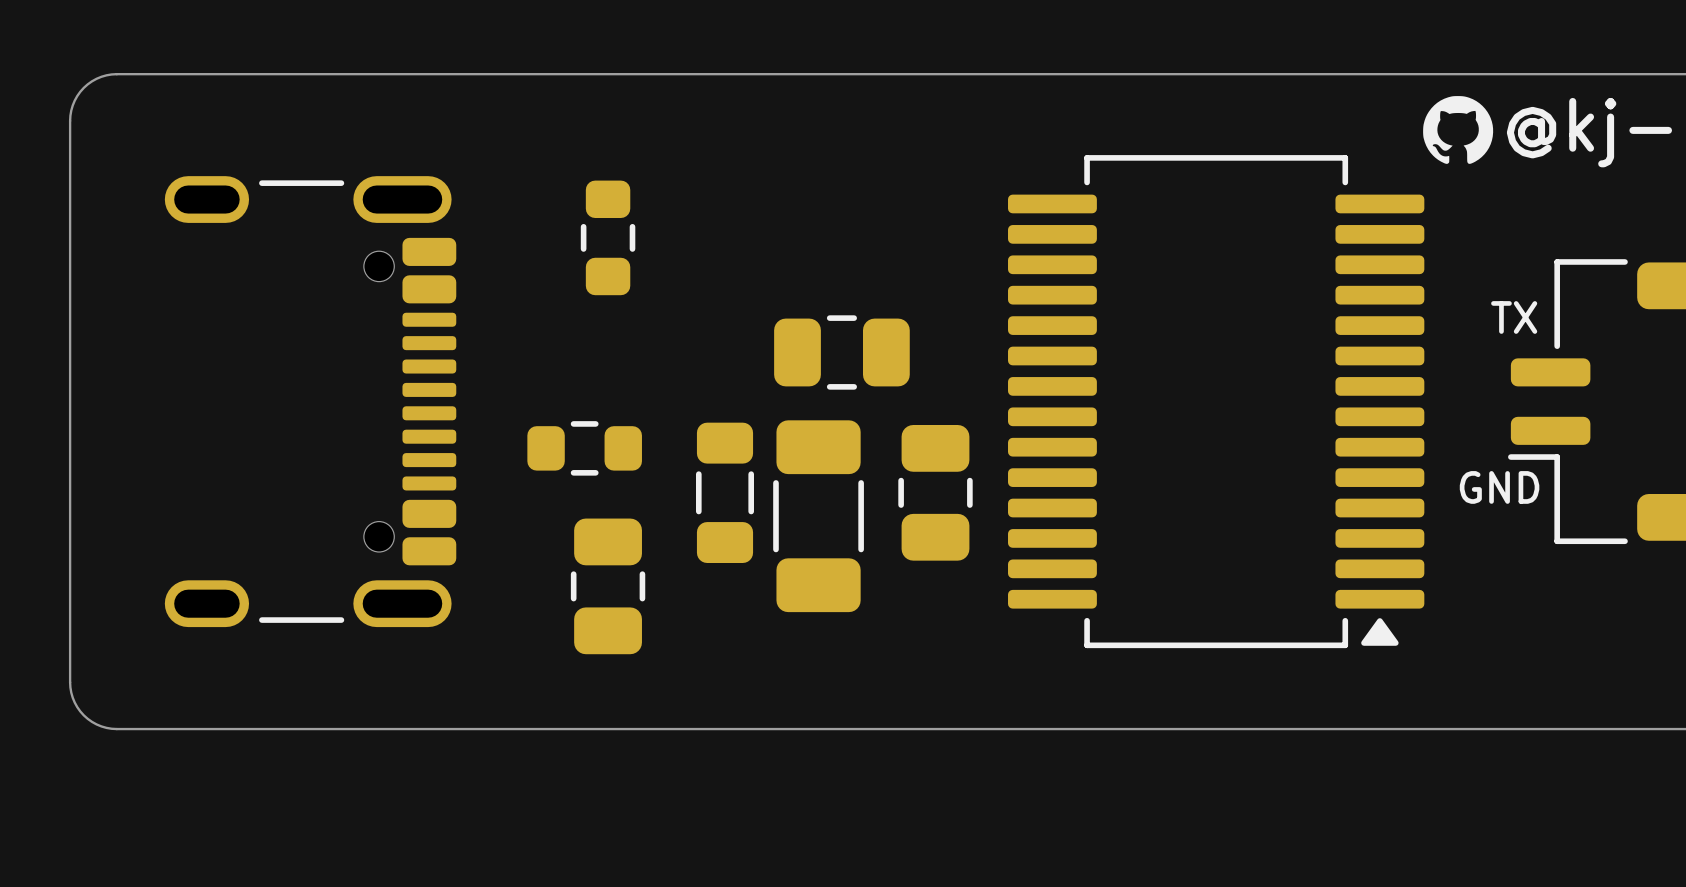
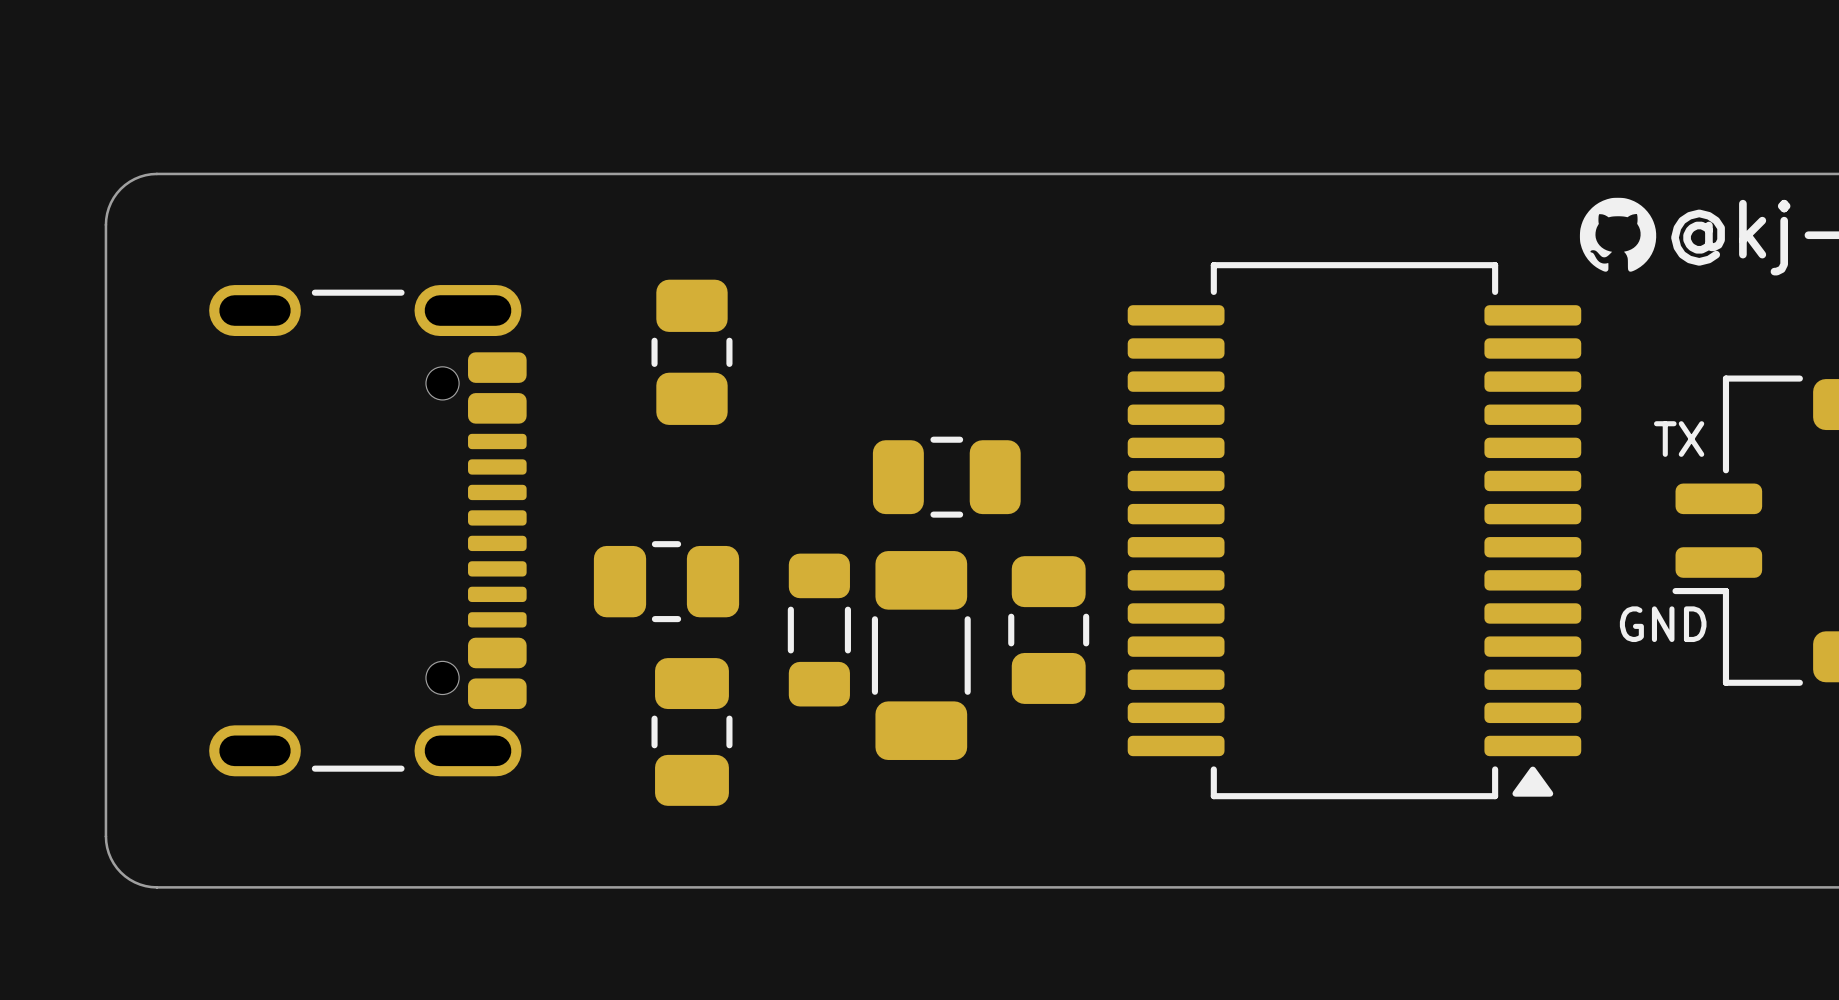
part footprint: [580, 180, 636, 296] -> [651, 279, 733, 425]
part footprint: [527, 421, 642, 476] -> [593, 541, 740, 623]

